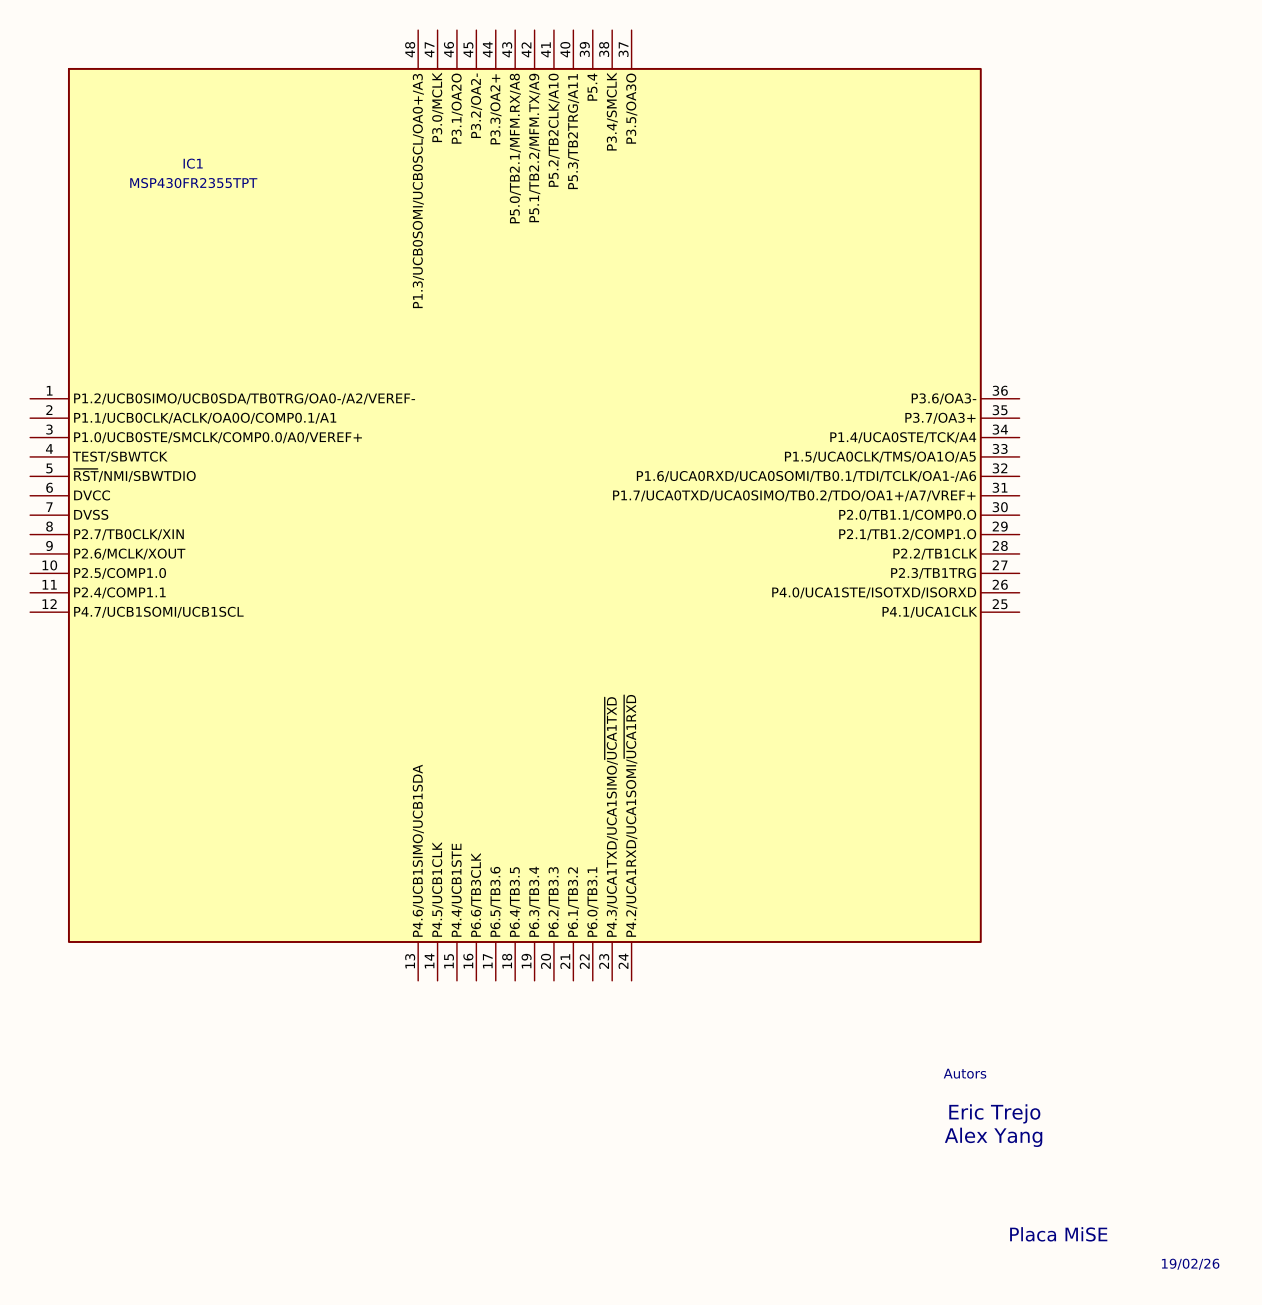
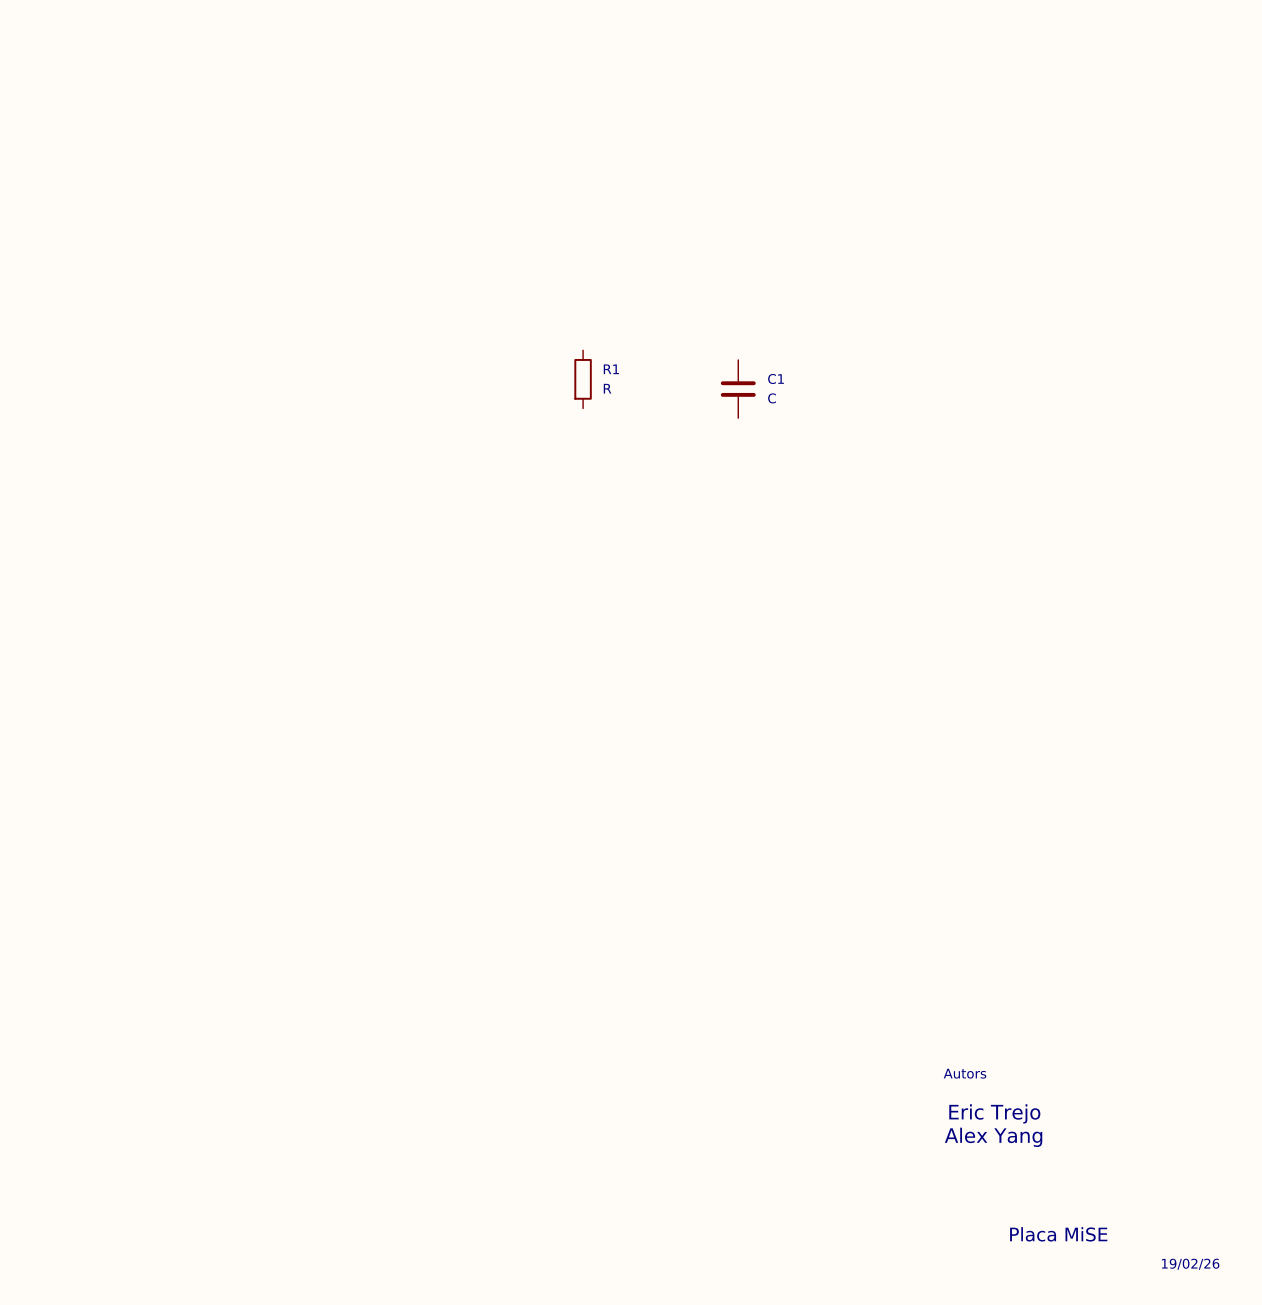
R1: none -> R (583, 379)
C1: none -> C (738, 389)
IC1: MSP430FR2355TPT (524, 505) -> none

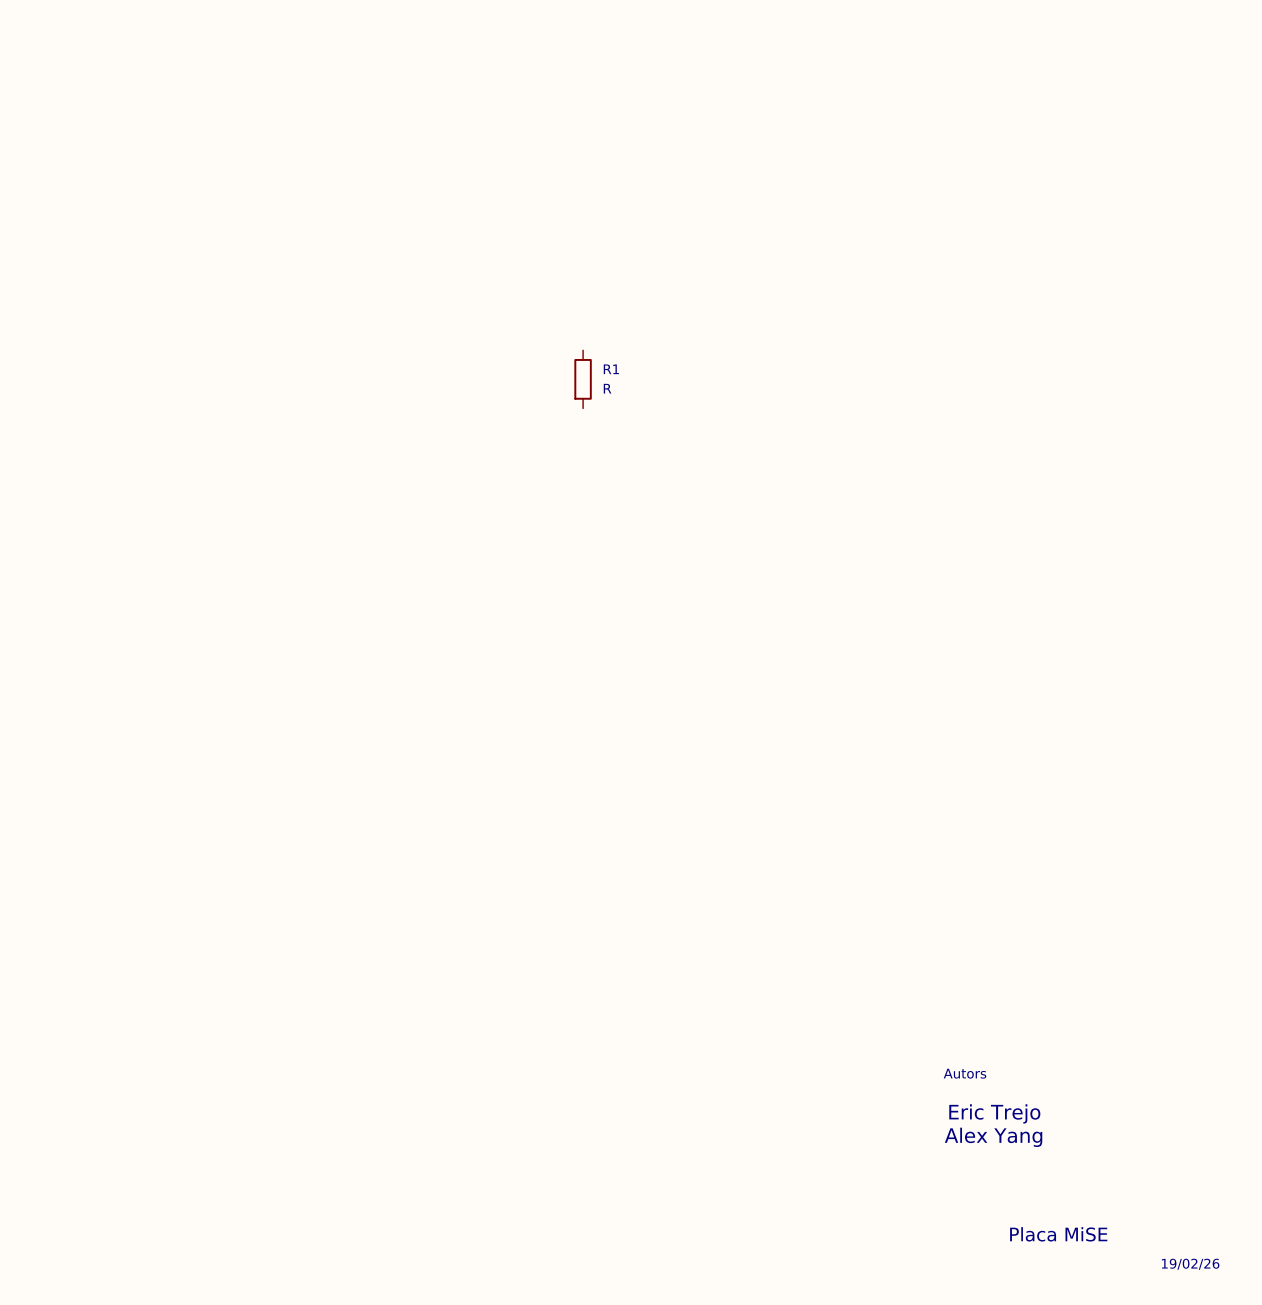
C1: C (738, 389) -> none

